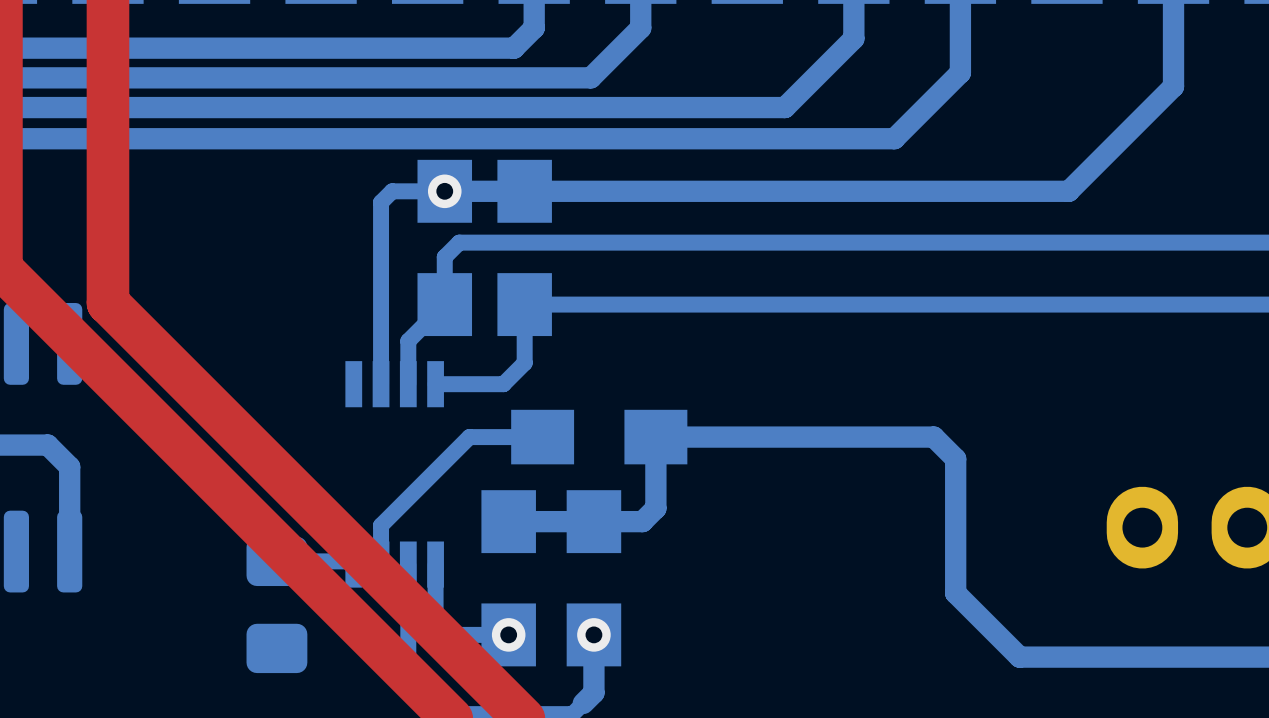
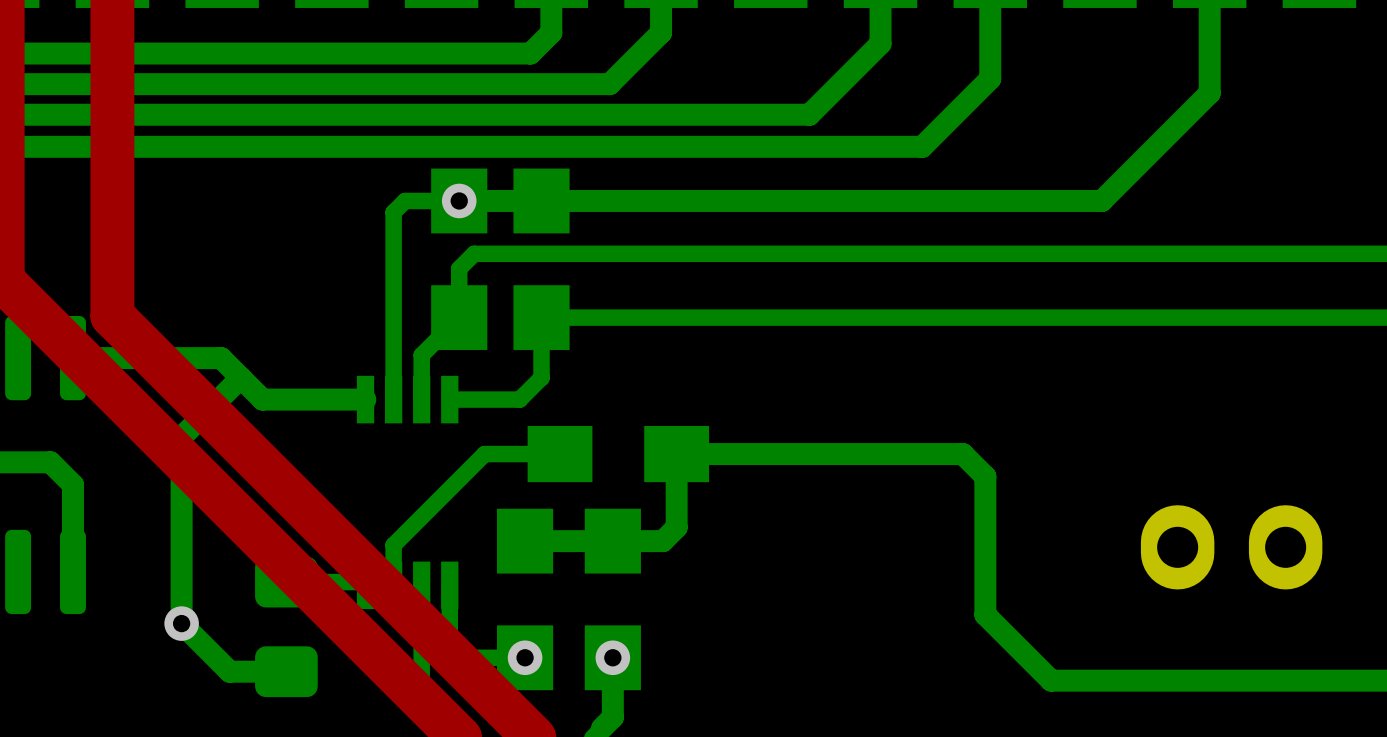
bottom track: none -> (72, 358) (221, 358) (262, 399) (365, 399)
bottom track: none -> (240, 377) (181, 437) (181, 623) (229, 671) (286, 671)
via: none -> (181, 623)

